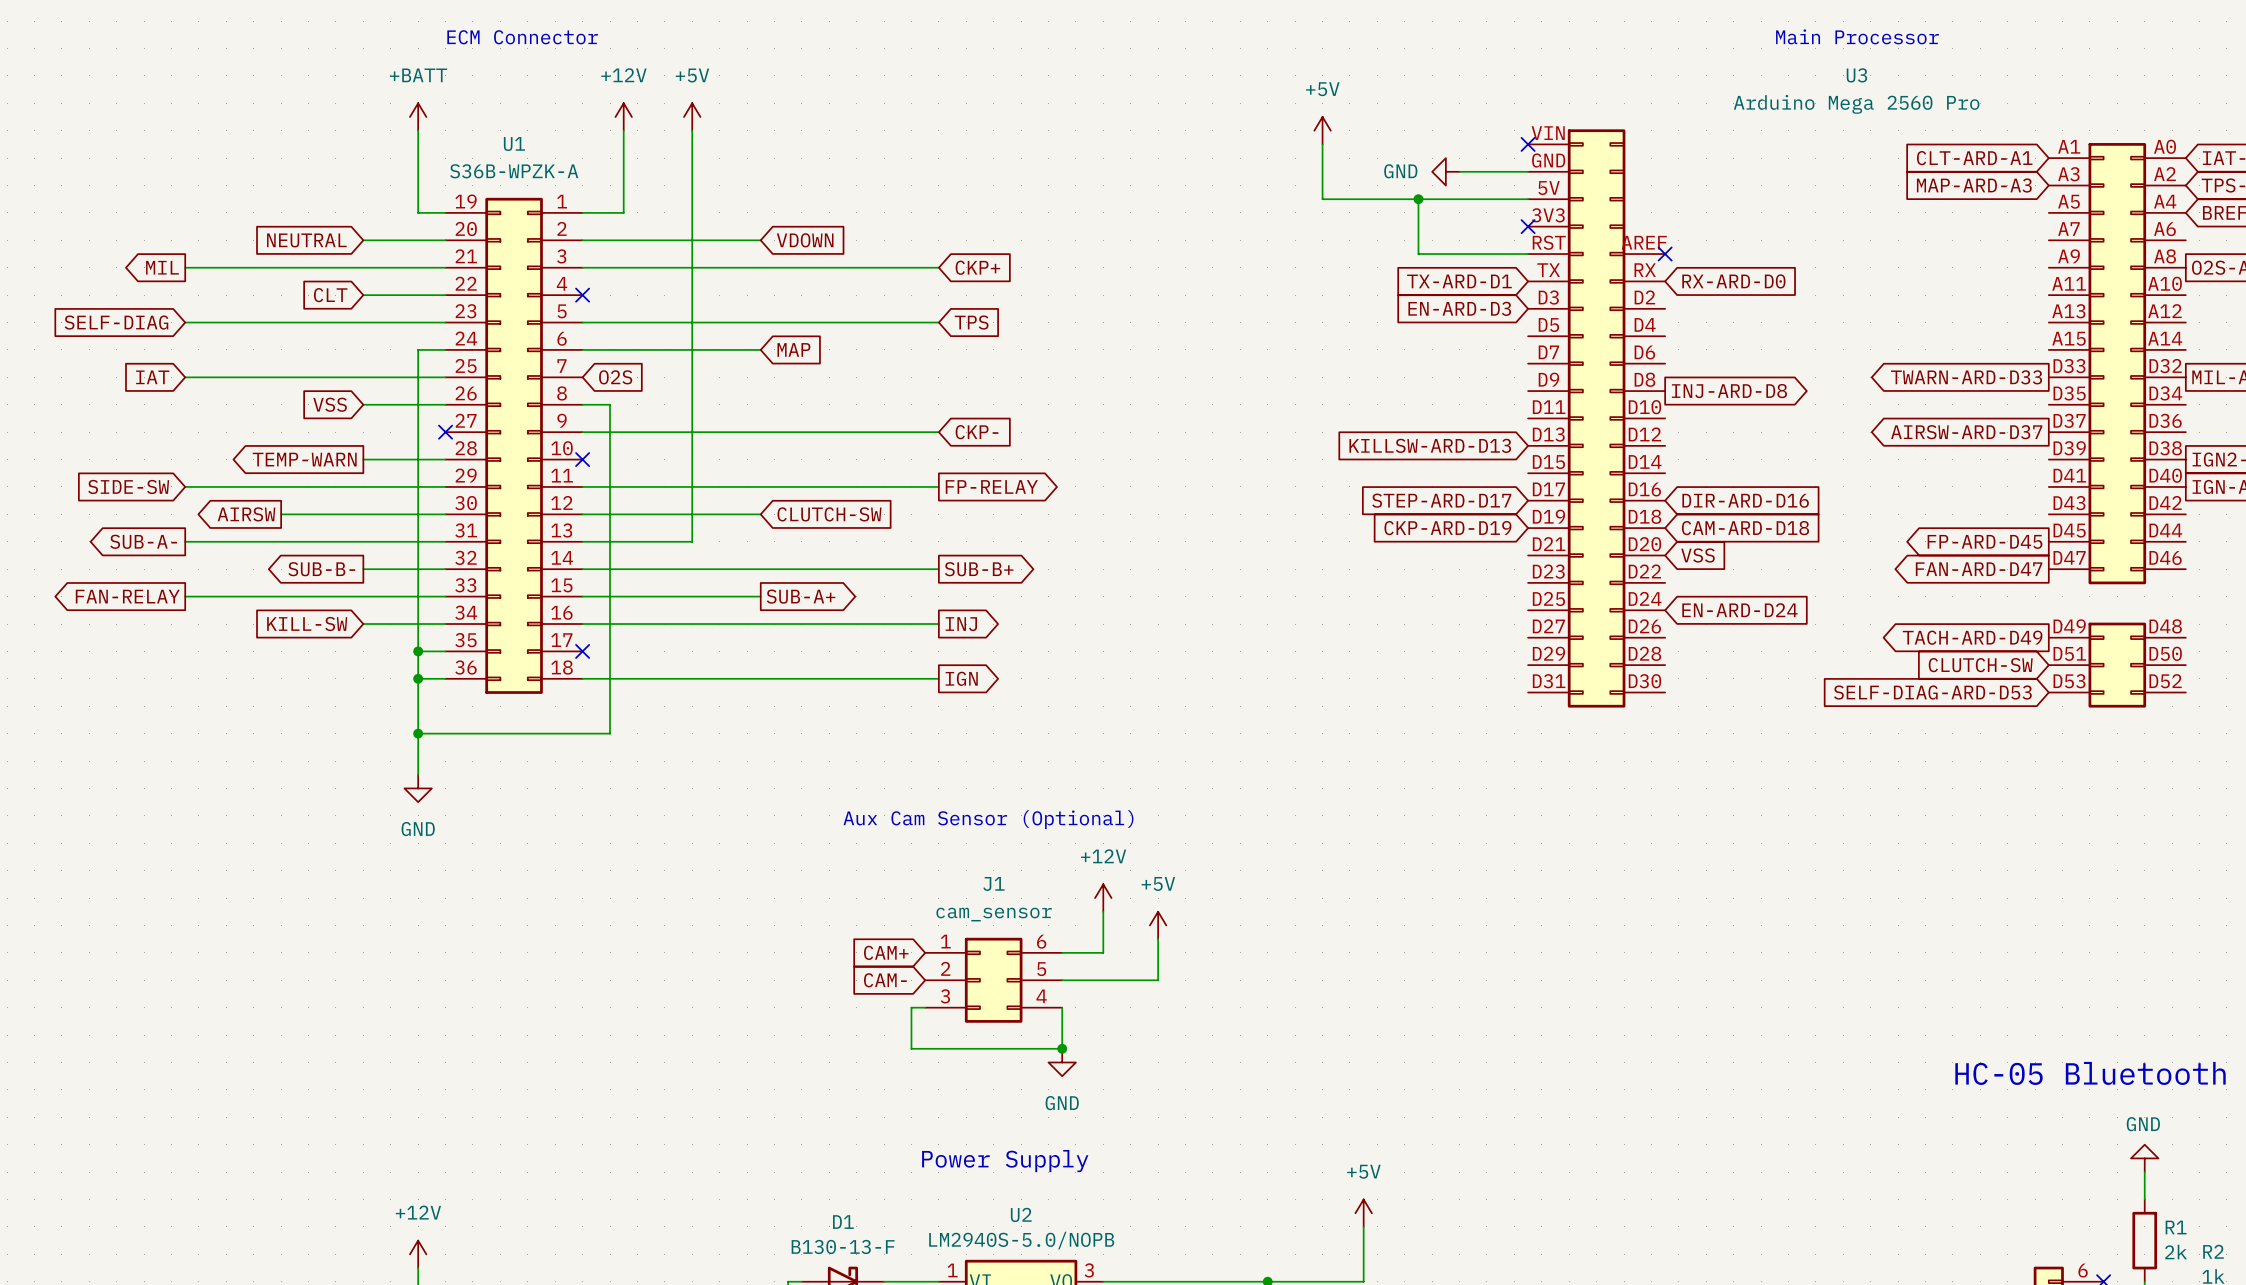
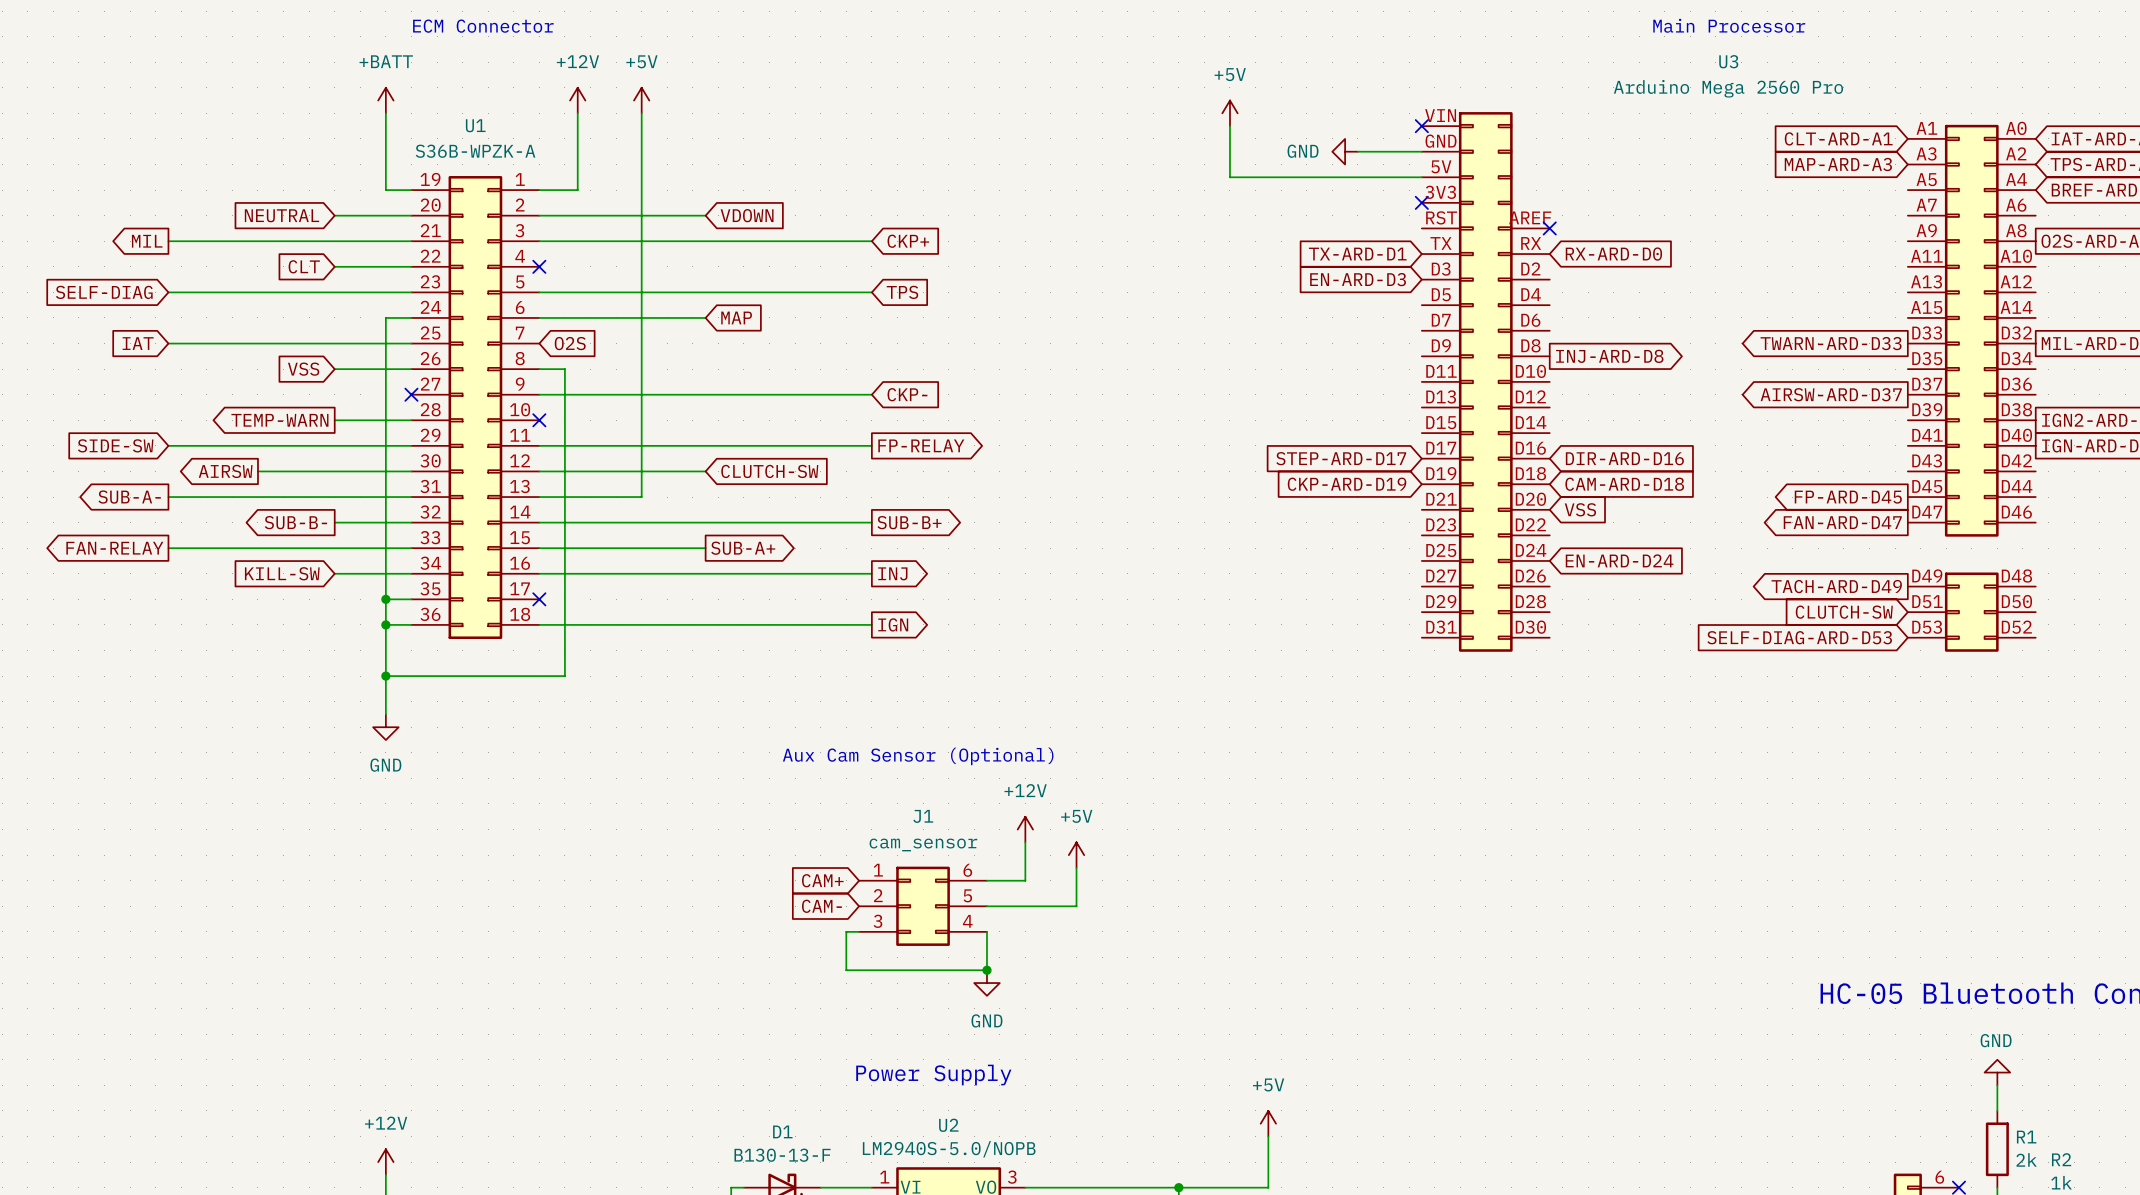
wire: (1418, 199) (1418, 254) (1528, 254) -> none
junction: (1418, 199) -> none
global label: KILLSW-ARD-D13 (1430, 445) -> none

